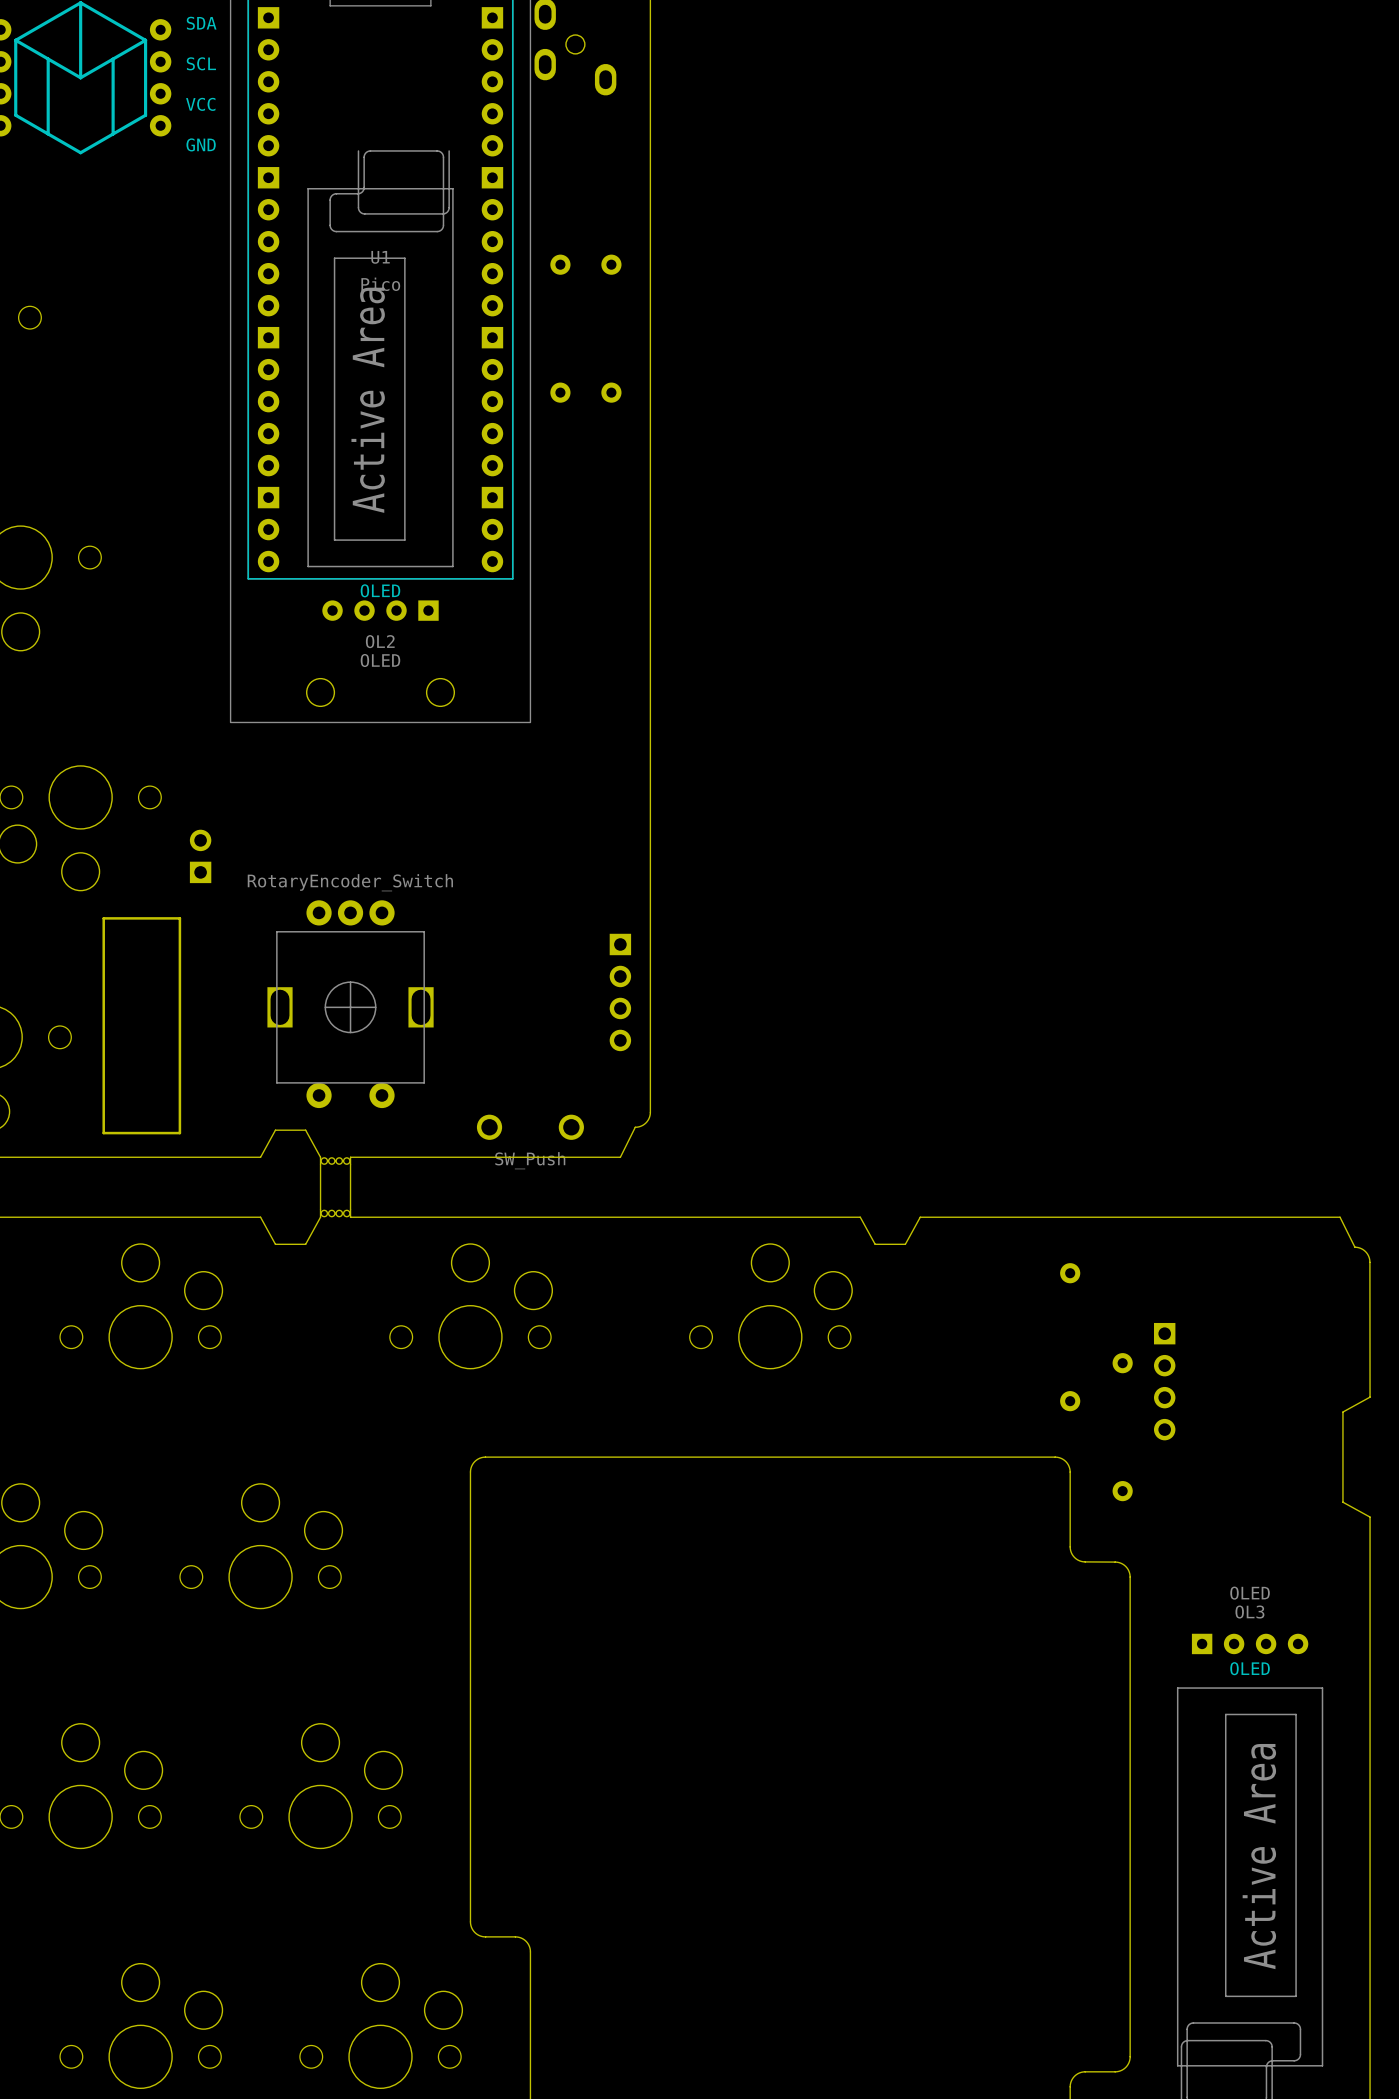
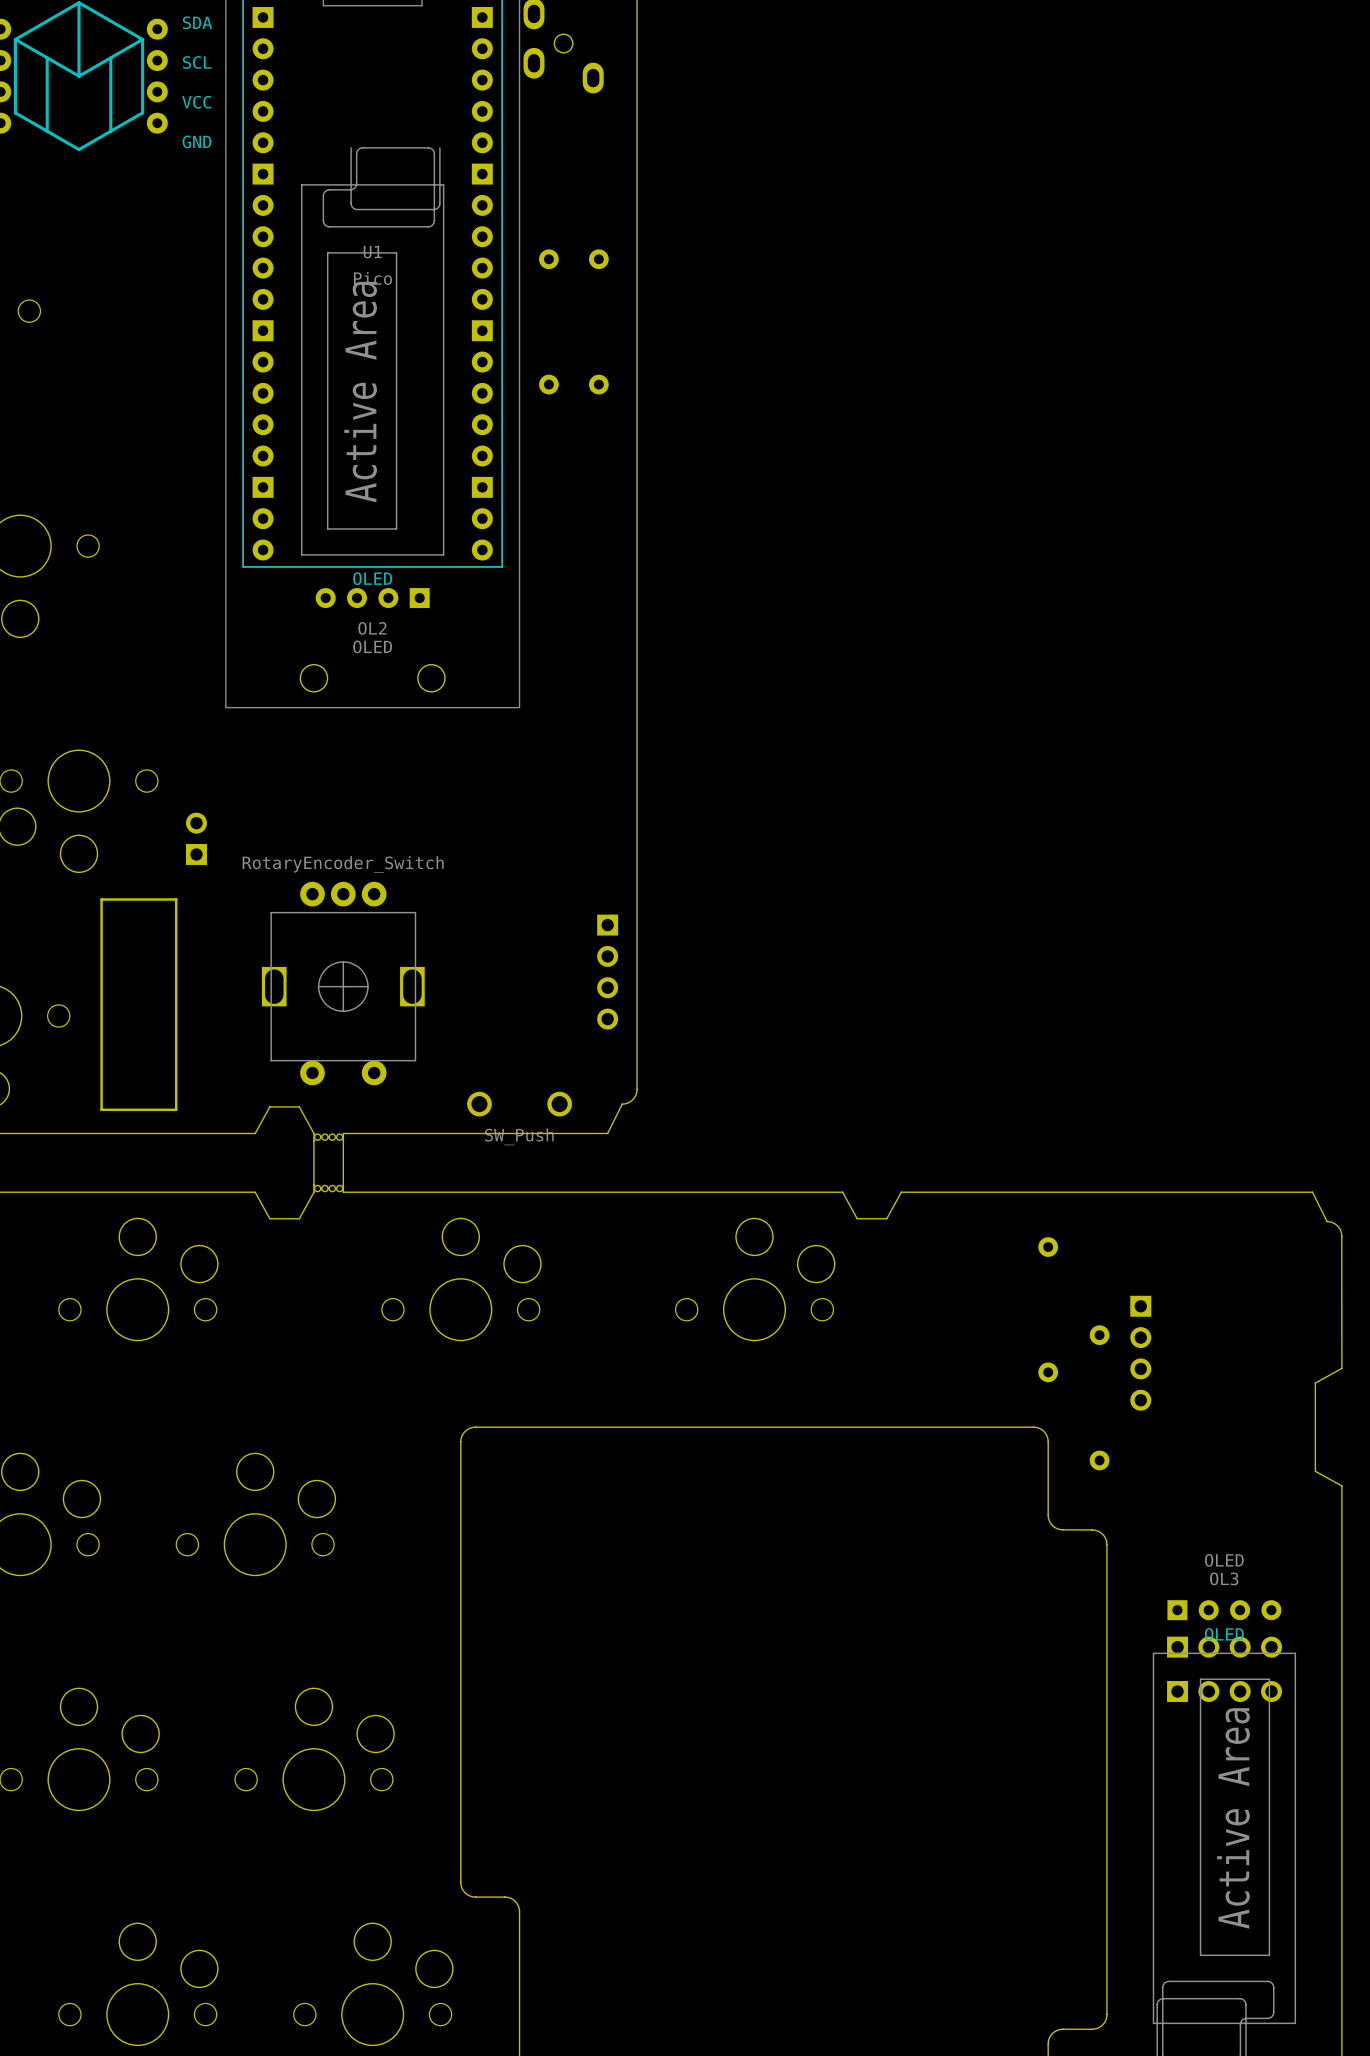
part: none -> (1224, 1647)
part: none -> (1224, 1691)

